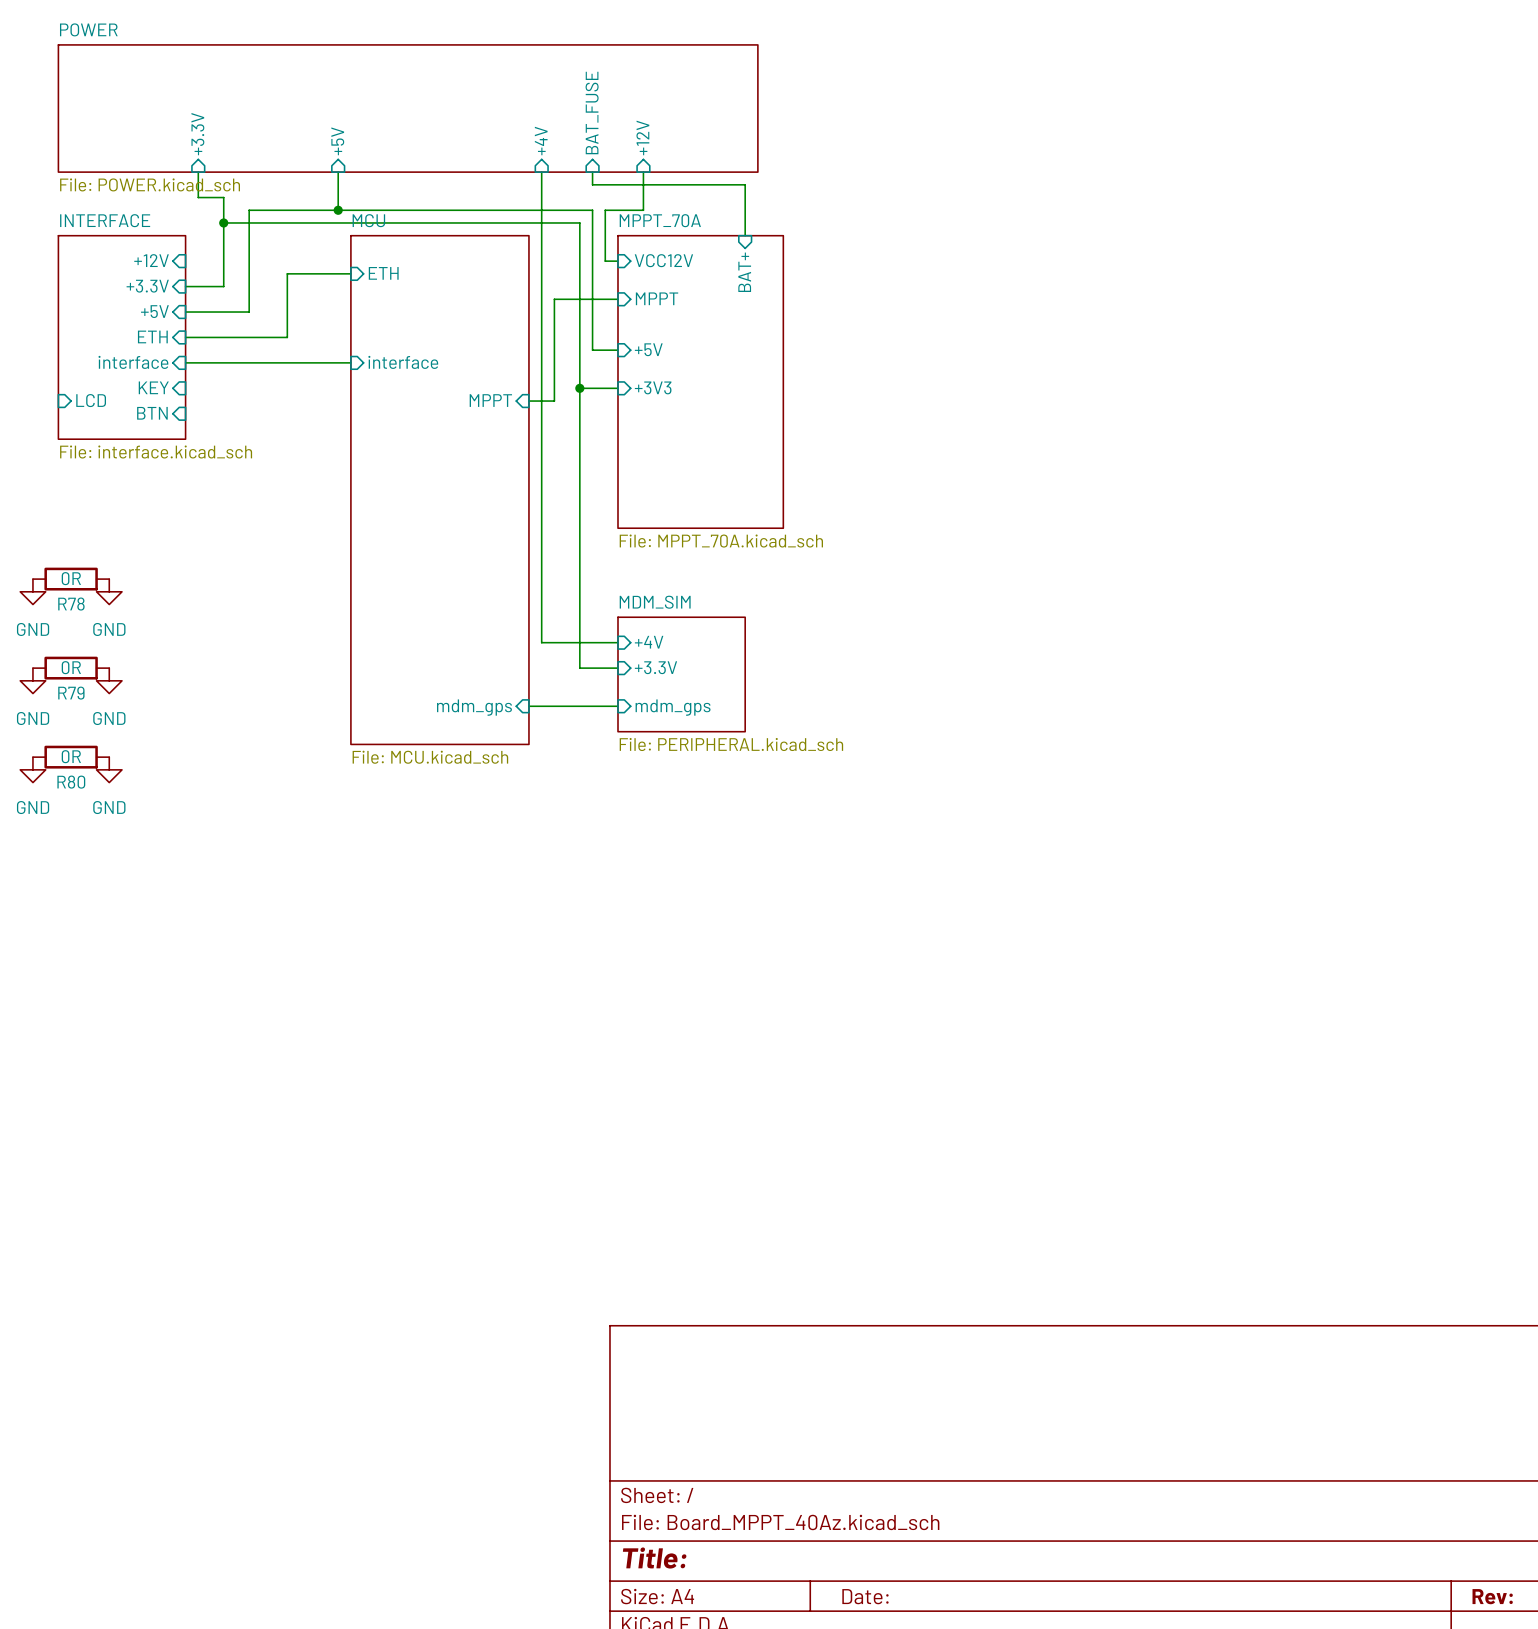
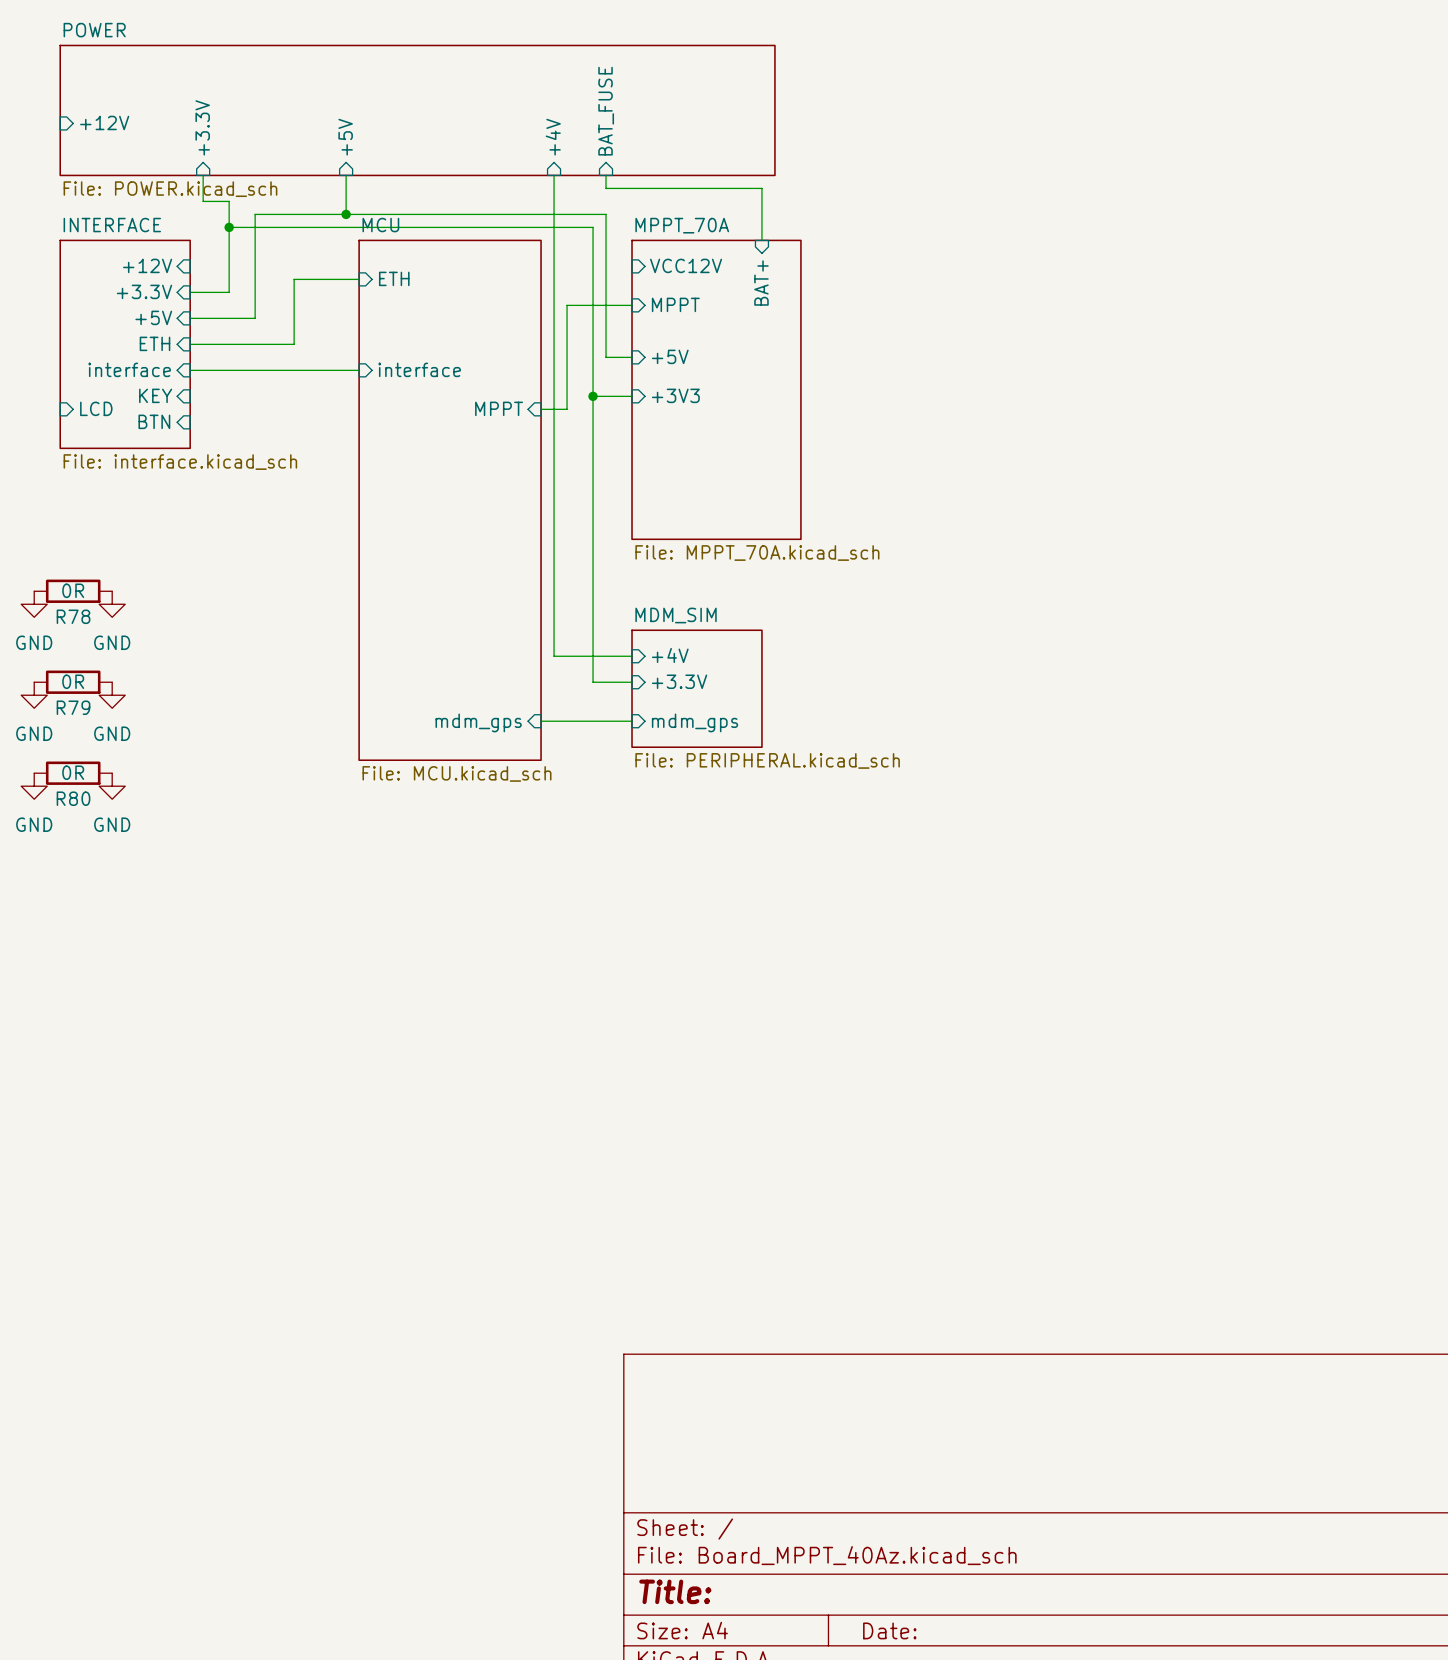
sheet pin: none -> +12V (104, 122)
sheet pin: +12V (642, 137) -> none
wire: (643, 172) (643, 210) (605, 210) (605, 261) (617, 261) -> none

